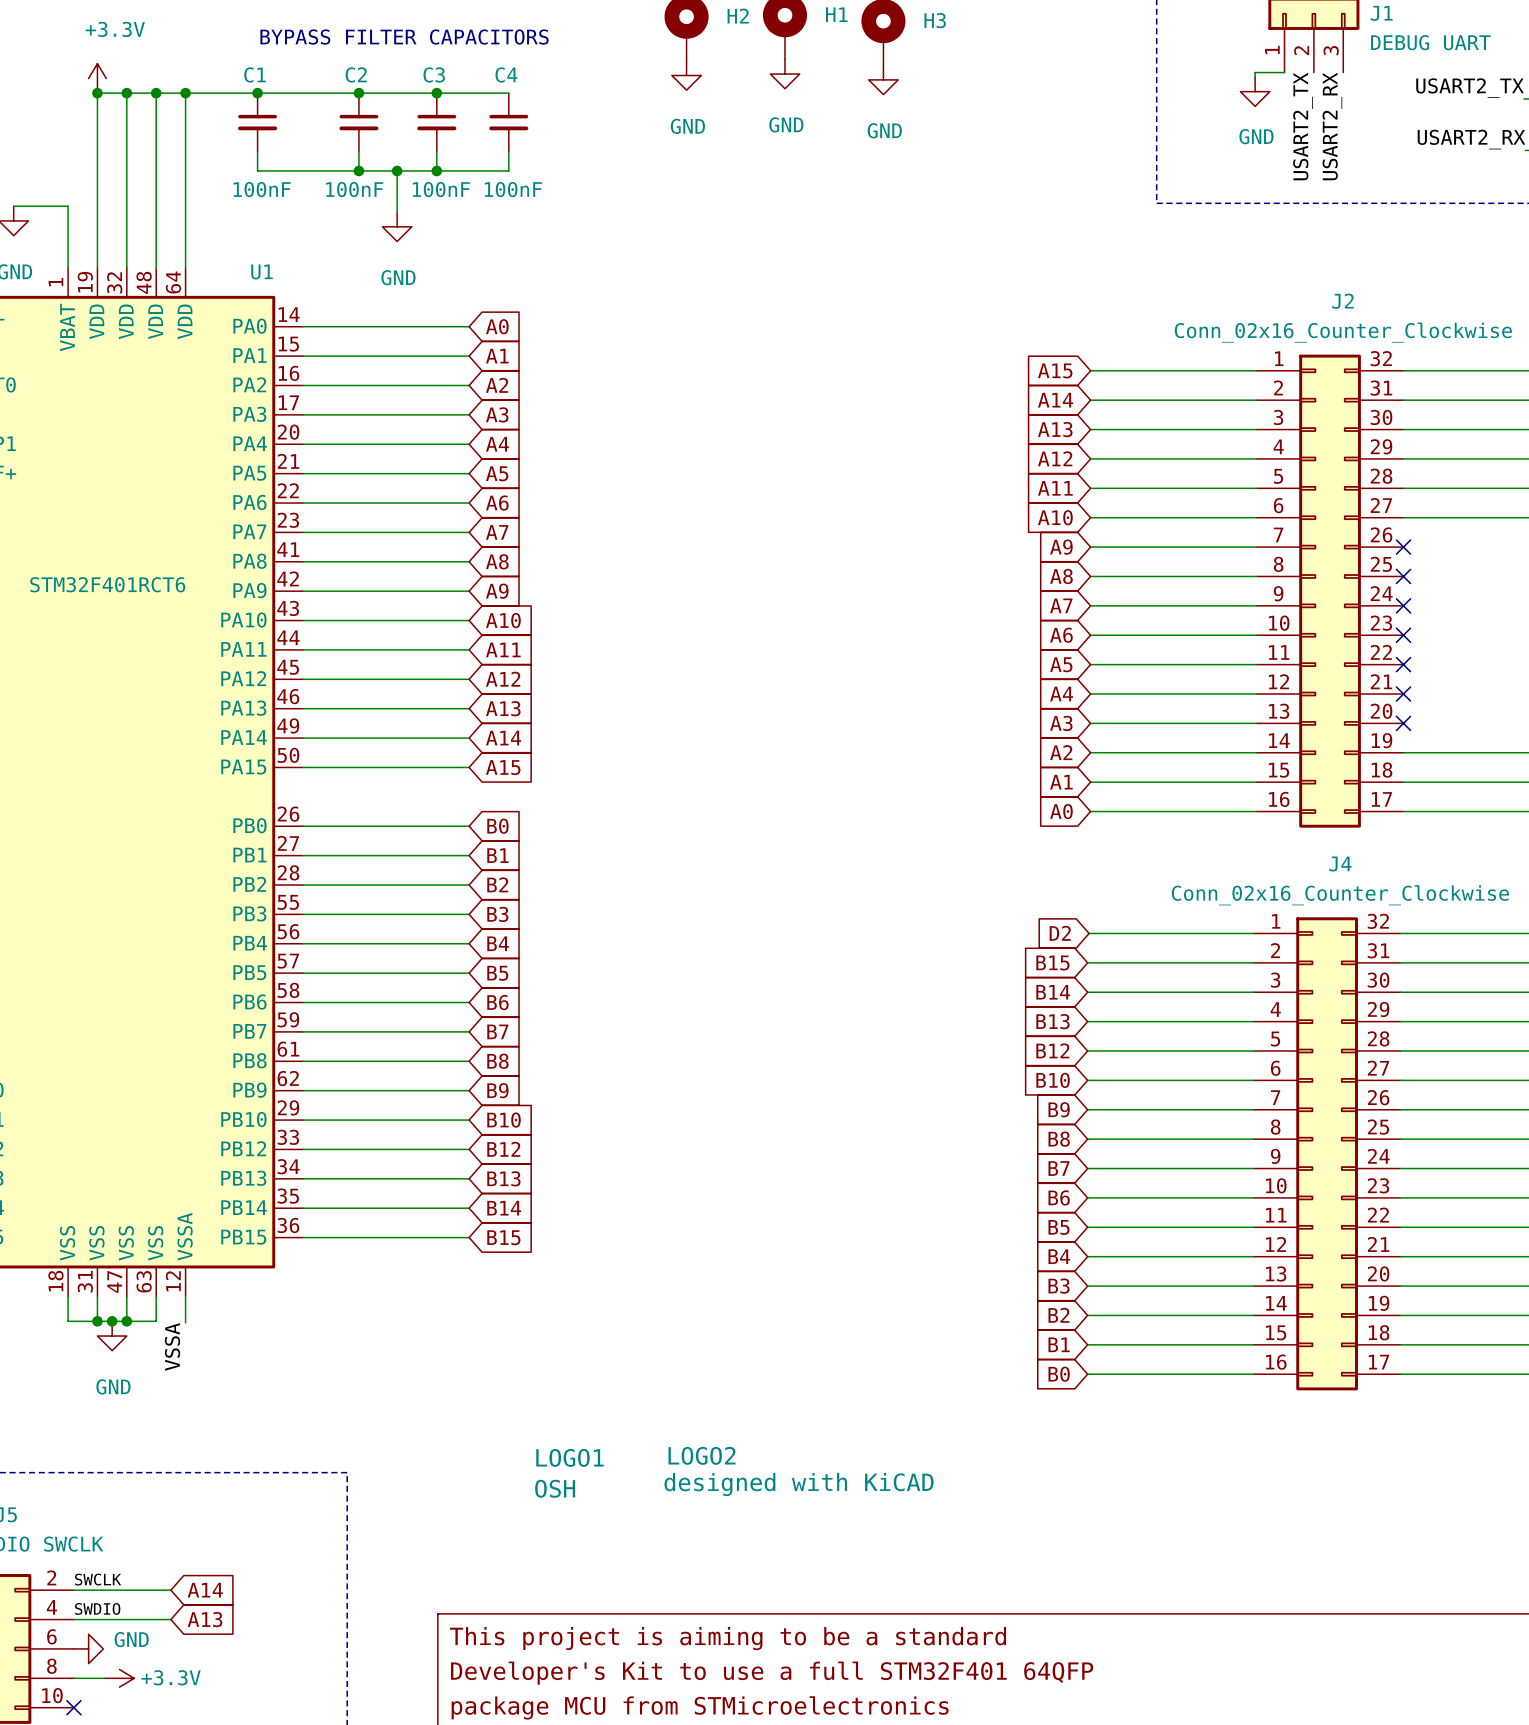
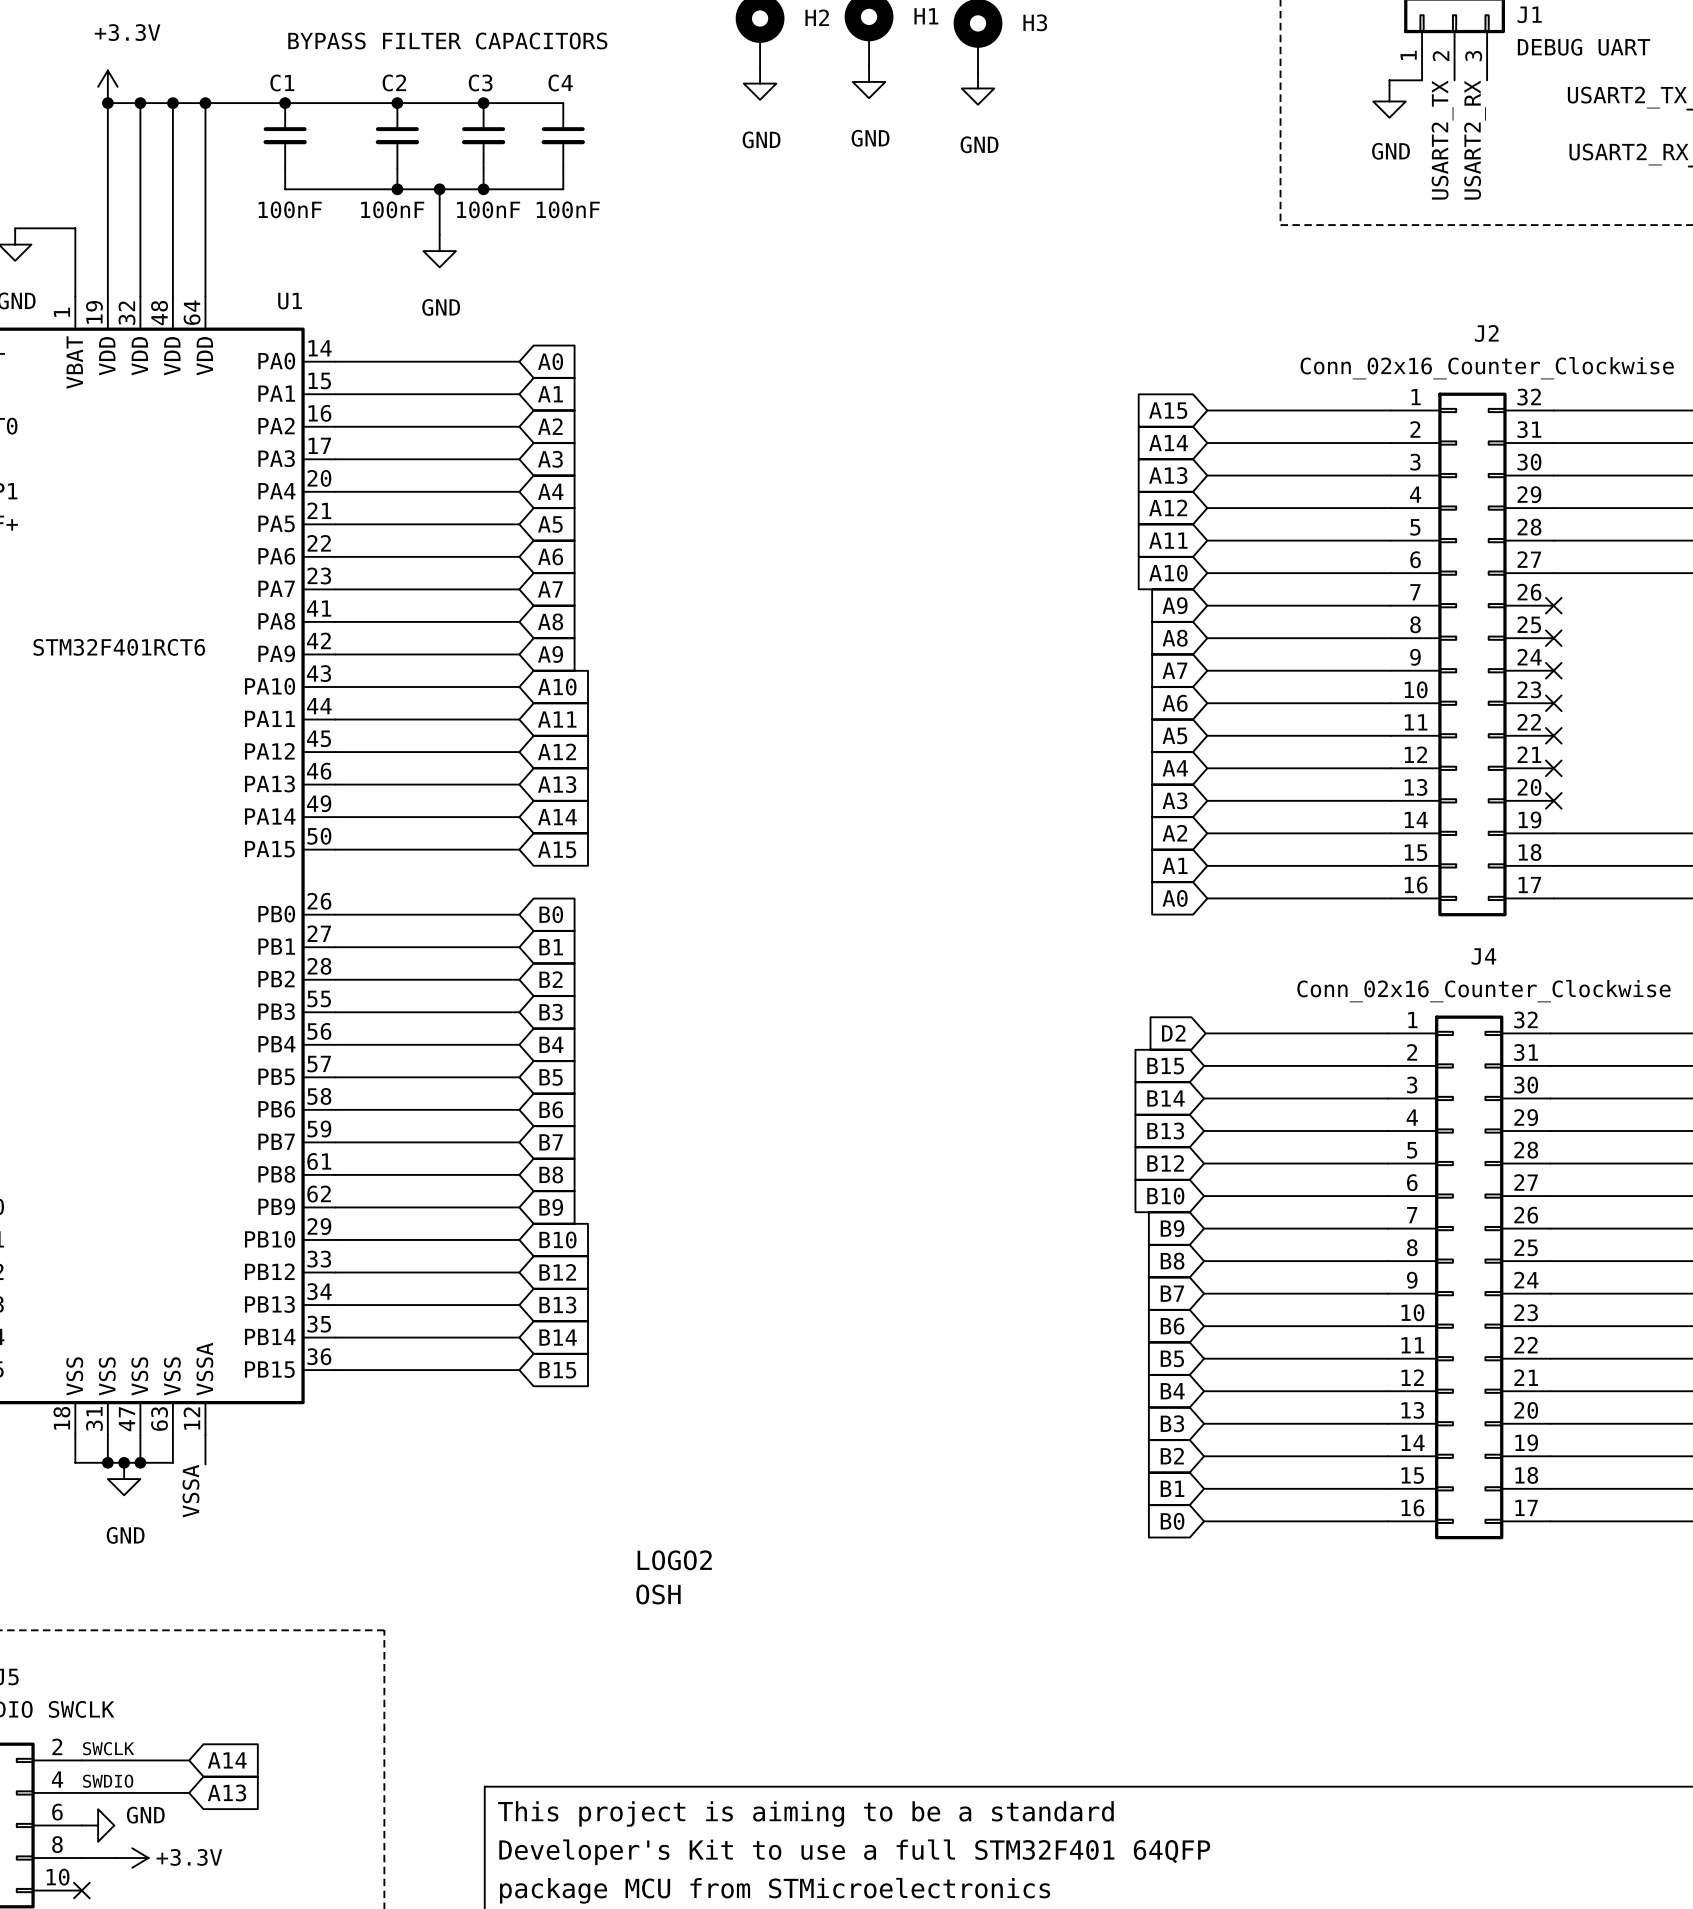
LOGO2 name position: LOGO2 (702, 1455) -> LOGO2 (674, 1560)
LOGO2 position: (799, 1471) -> (674, 1577)
LOGO1: OSH (569, 1473) -> none
LOGO2 value: designed with KiCAD (799, 1484) -> OSH (658, 1594)

